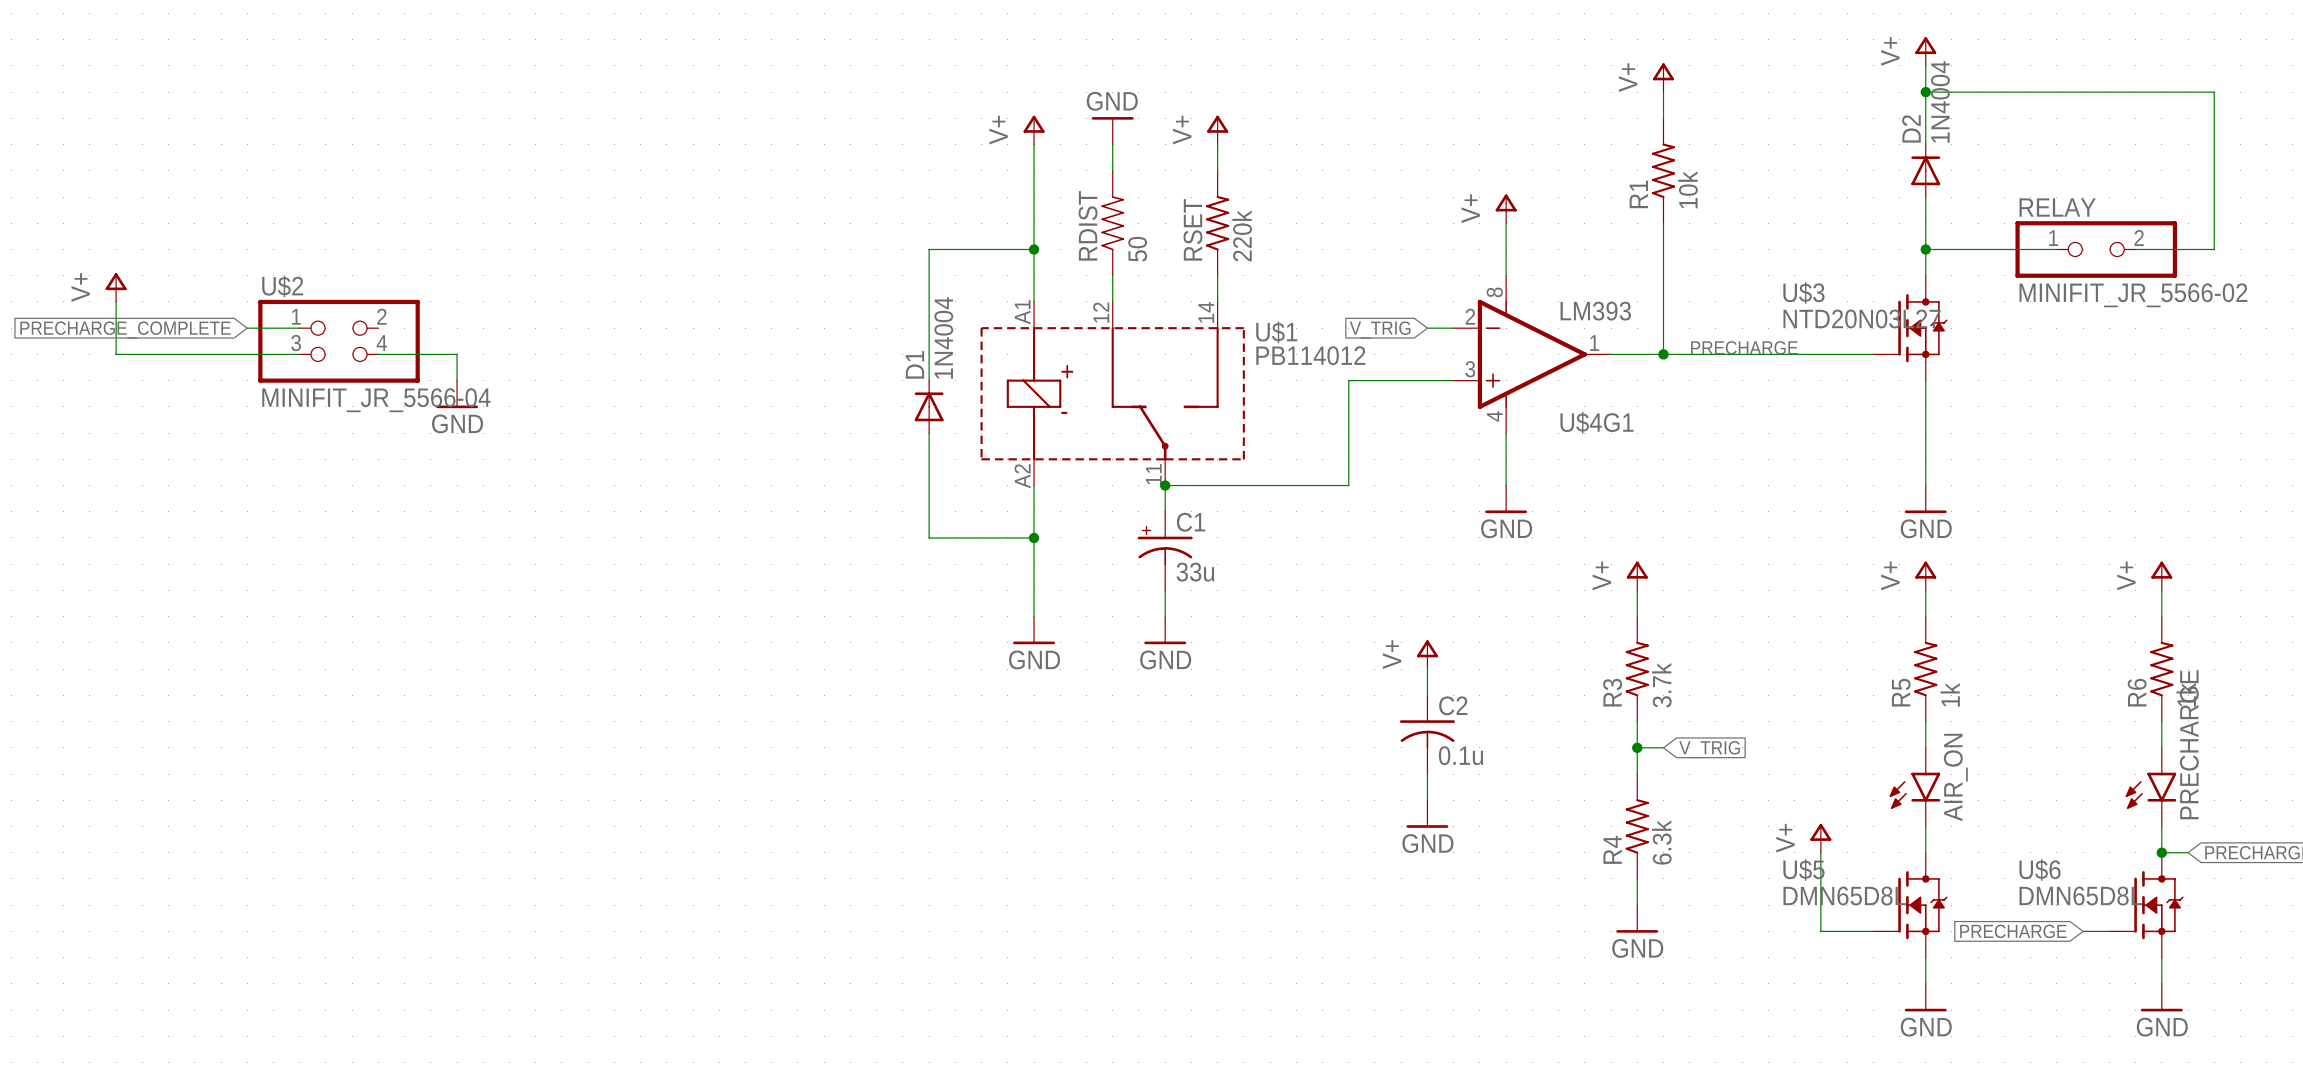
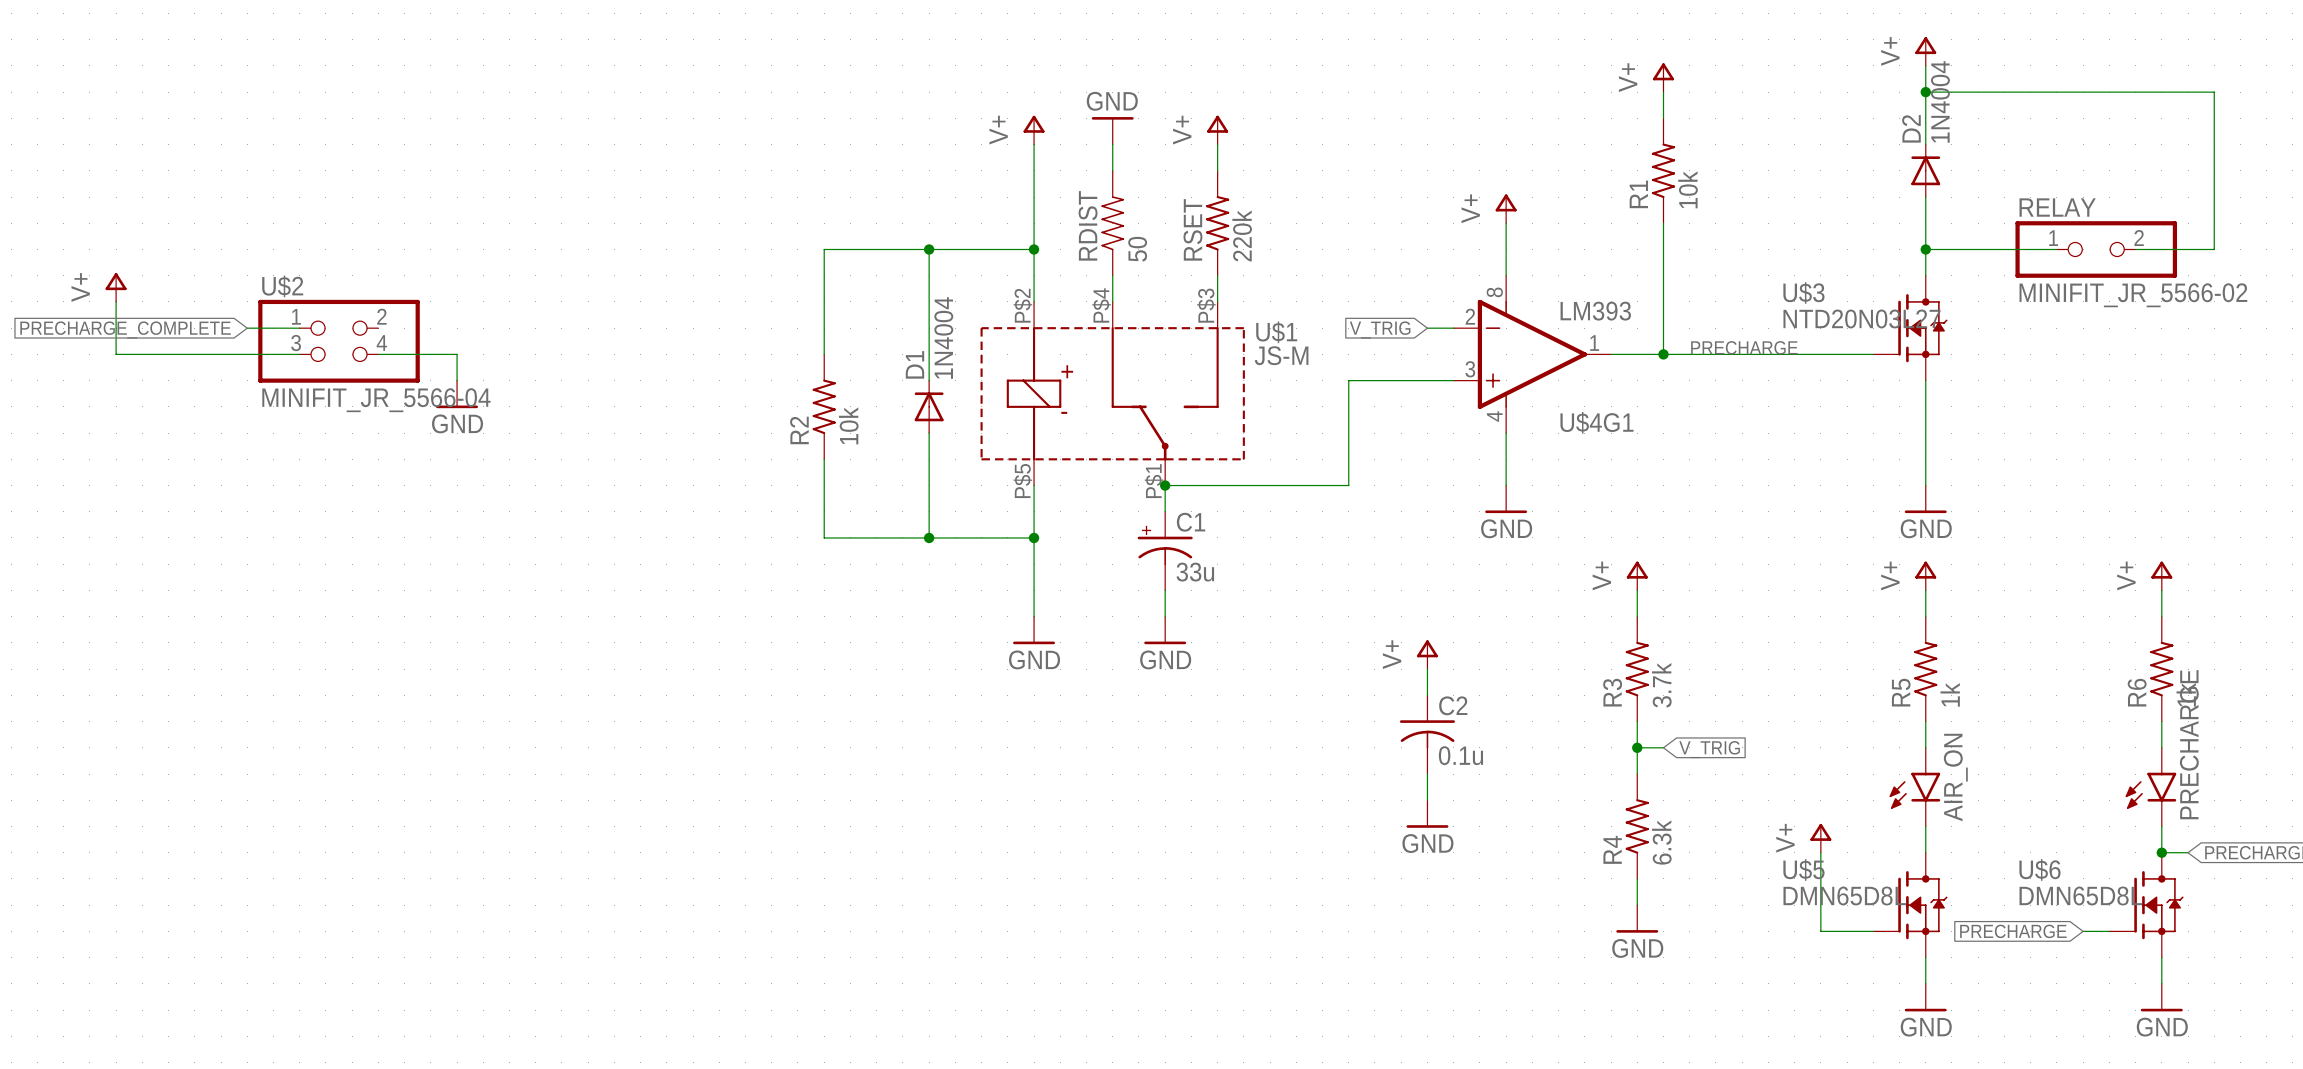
wire: none -> (929, 249) (824, 249) (824, 354)
junction: none -> (929, 249)
U$1 pin number: A1 (1022, 312) -> P$2 (1022, 305)
U$1 pin number: 12 (1101, 312) -> P$4 (1101, 305)
U$1 pin number: 14 (1206, 312) -> P$3 (1206, 305)
U$1 value: PB114012 (1310, 355) -> JS-M (1281, 355)
R2: none -> 10k (824, 406)
wire: none -> (824, 459) (824, 537) (929, 537)
U$1 pin number: 11 (1153, 474) -> P$1 (1154, 481)
U$1 pin number: A2 (1022, 476) -> P$5 (1022, 481)
junction: none -> (929, 537)

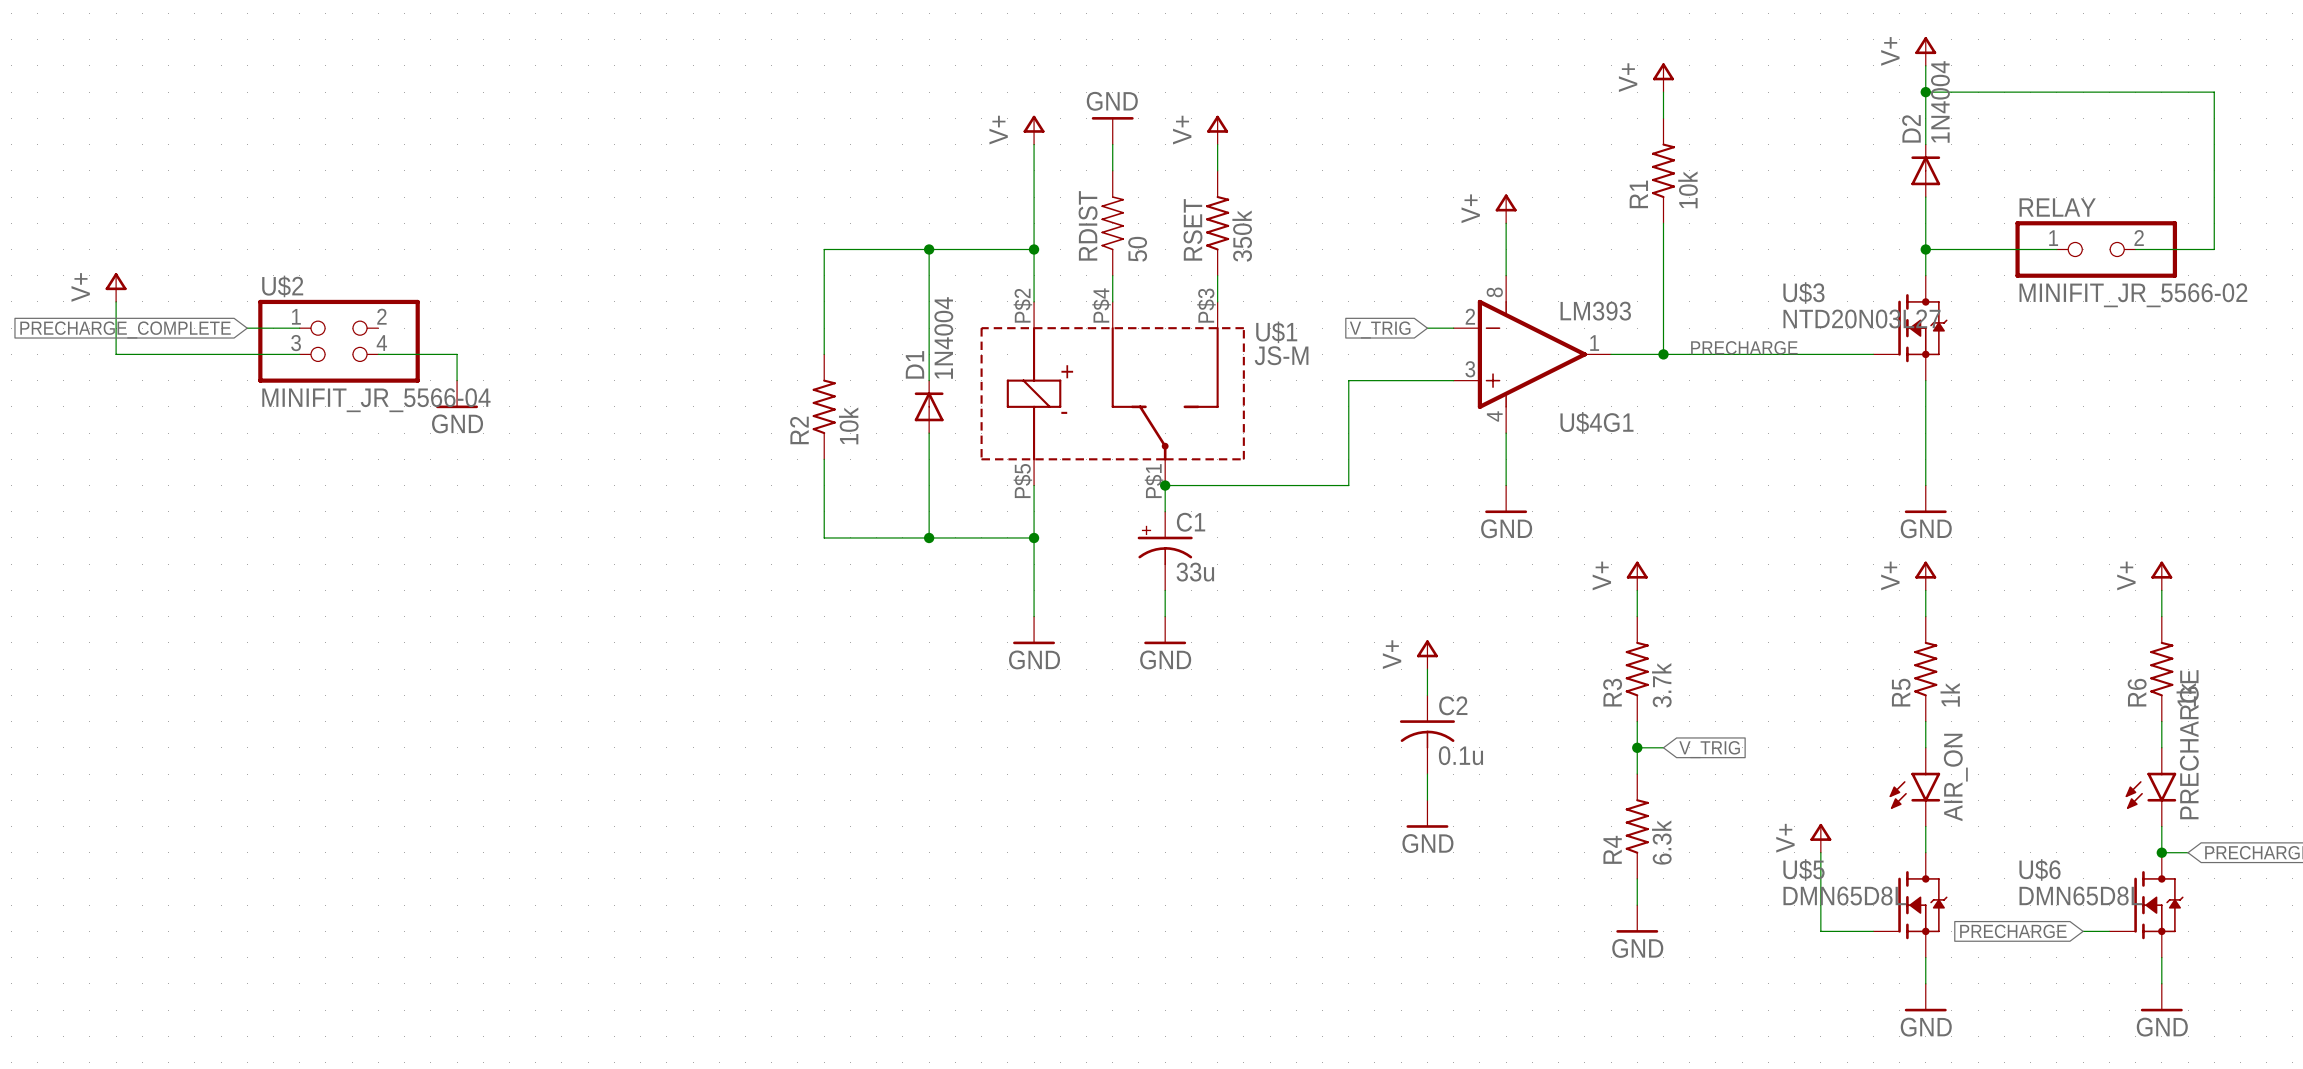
RSET value: 220k (1242, 235) -> 350k (1242, 236)

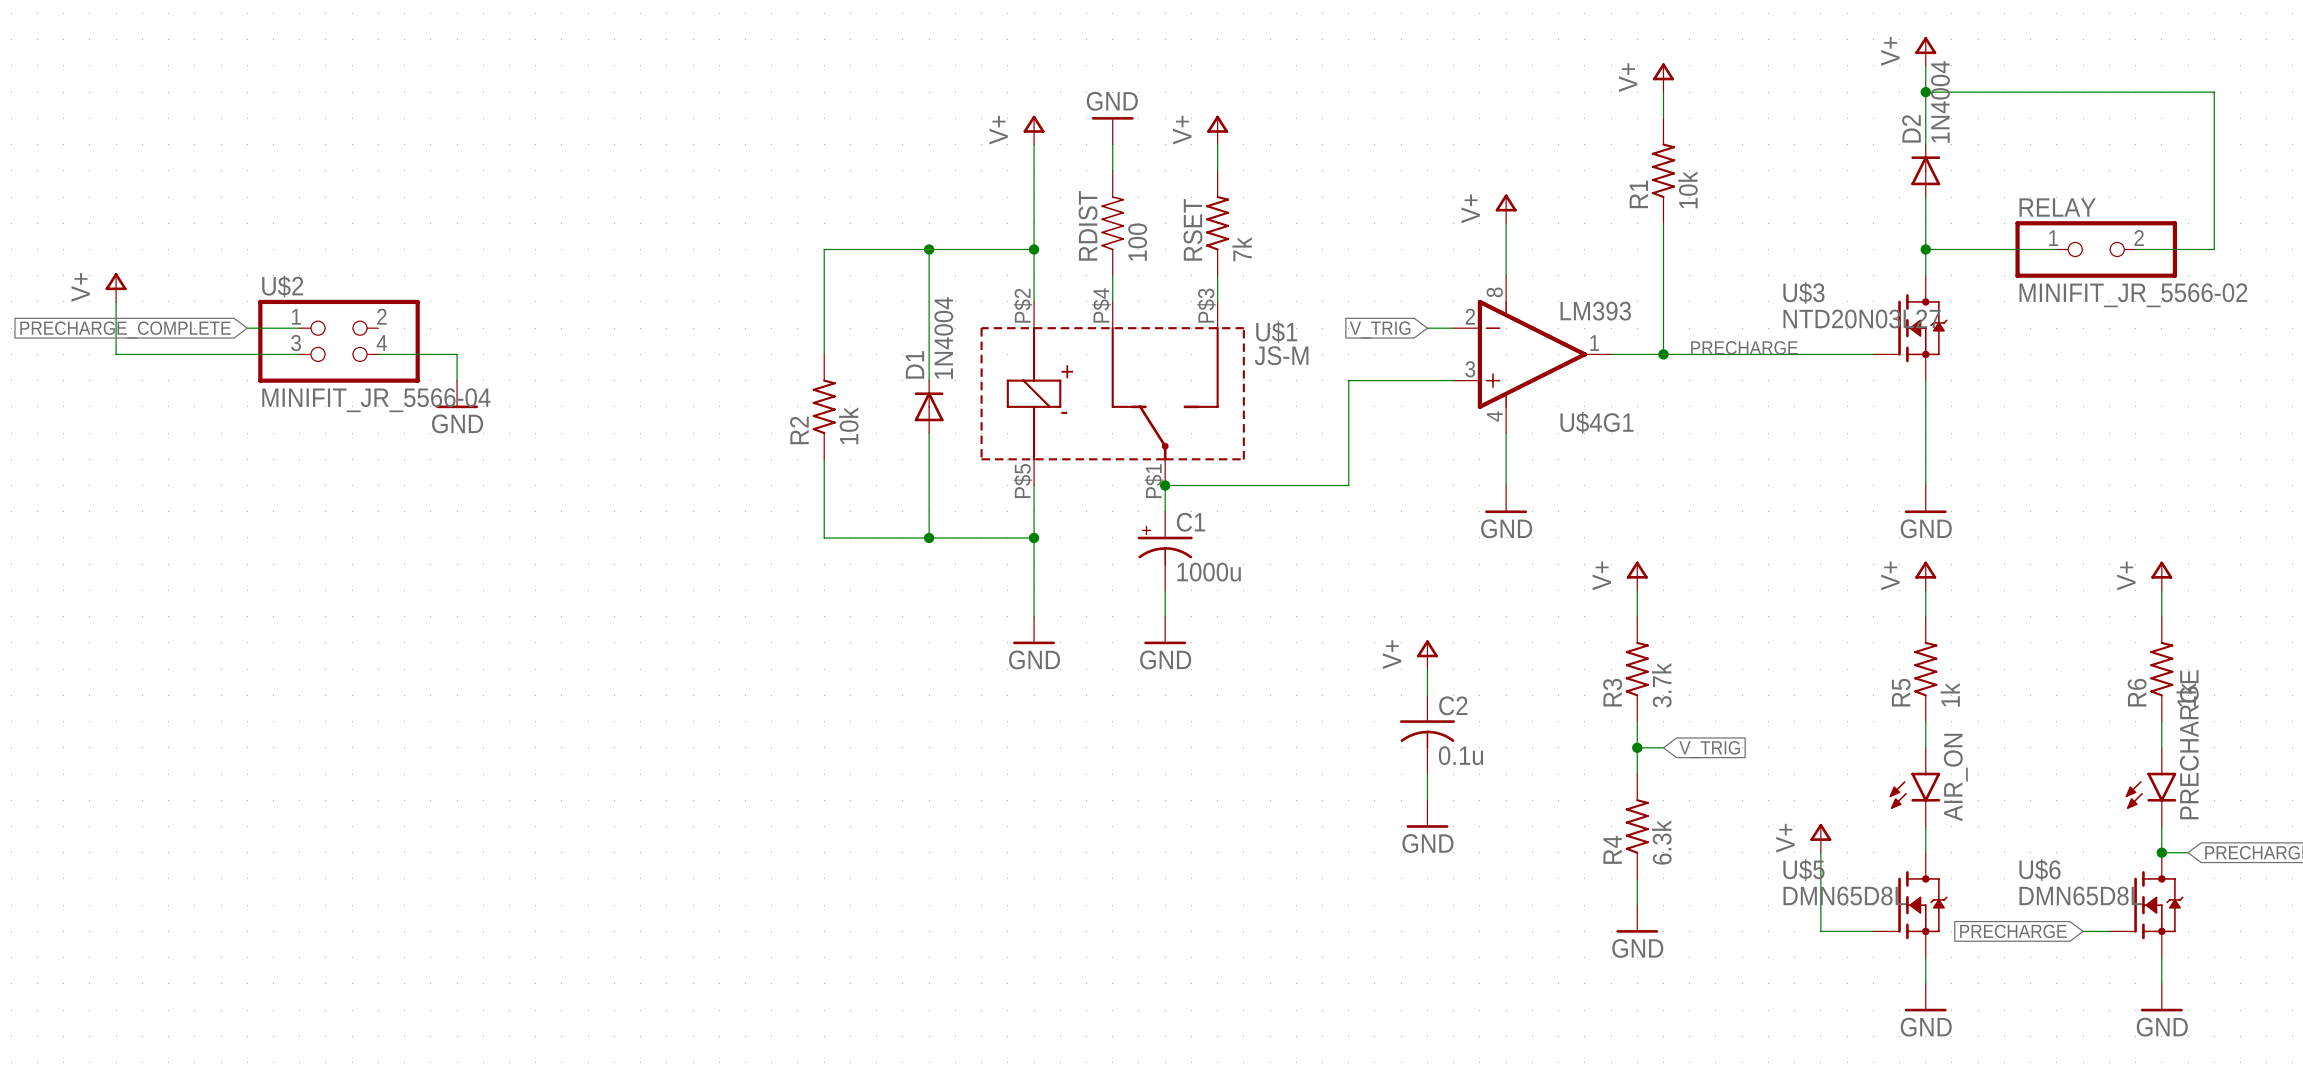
RSET value: 350k (1242, 236) -> 7k (1242, 249)
RDIST value: 50 (1137, 249) -> 100 (1137, 242)
C1 value: 33u (1195, 572) -> 1000u (1209, 572)

